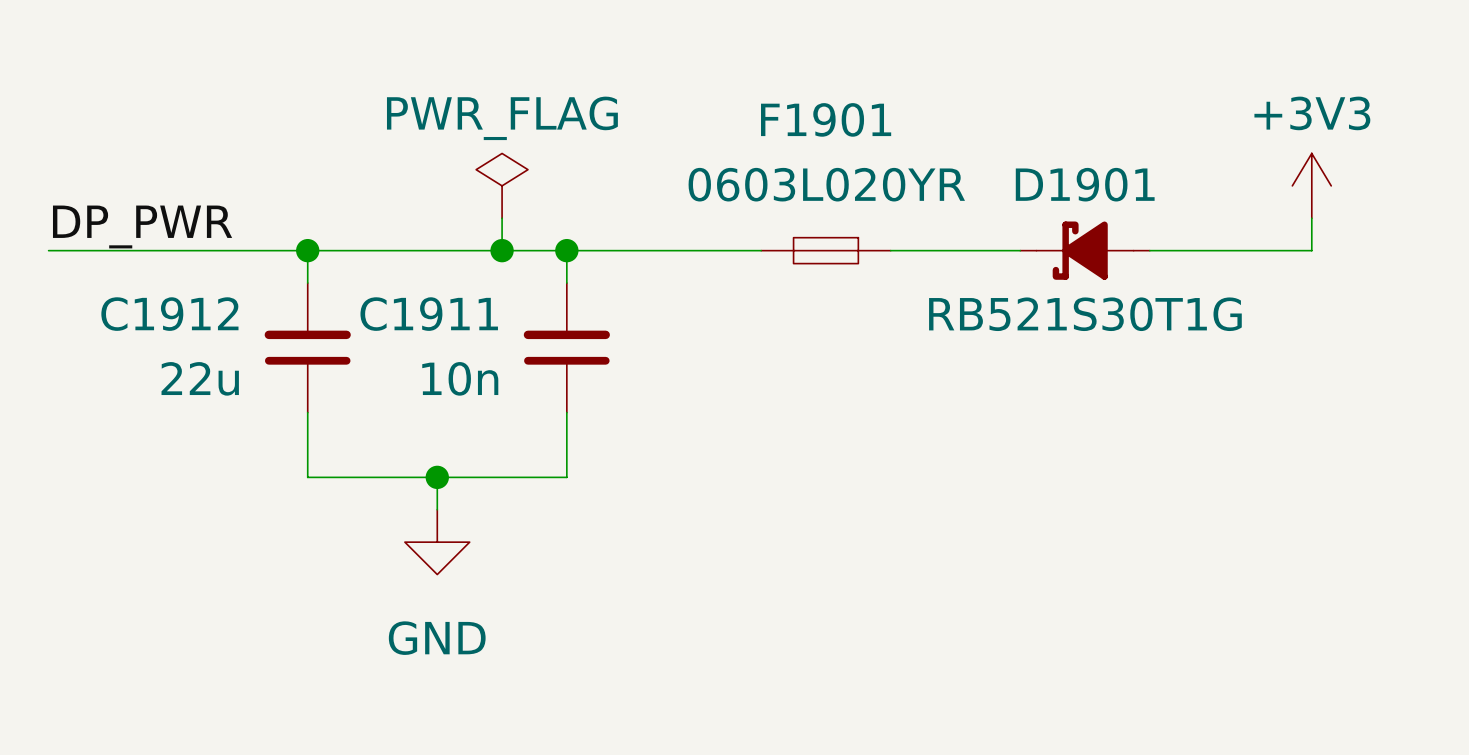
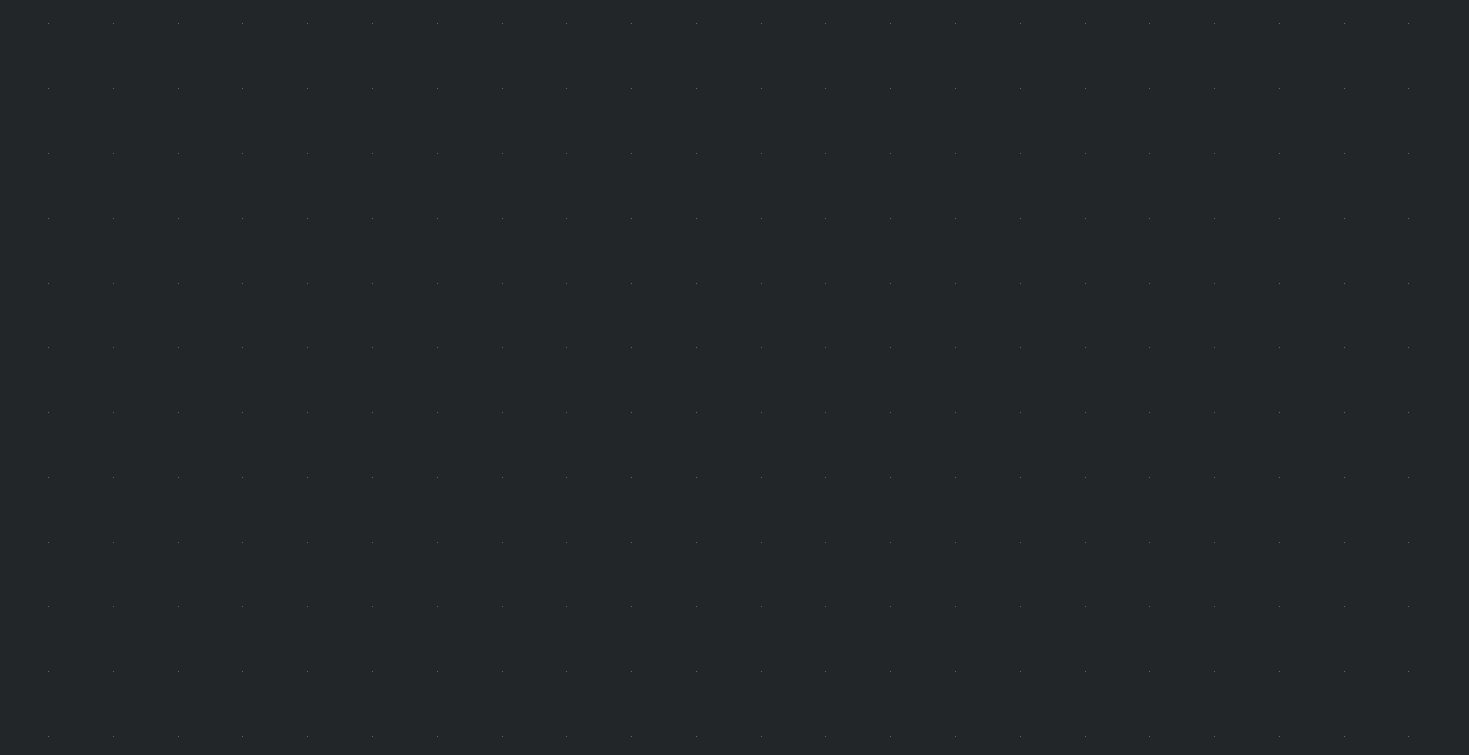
power symbol: PWR_FLAG (502, 185) -> none
power symbol: +3V3 (1311, 185) -> none
wire: (502, 218) (502, 250) -> none
wire: (1311, 218) (1311, 250) (1149, 250) -> none
label: DP_PWR (142, 226) -> none
wire: (48, 250) (761, 250) -> none
wire: (307, 250) (307, 283) -> none
junction: (307, 250) -> none
junction: (502, 250) -> none
wire: (566, 250) (566, 283) -> none
junction: (566, 250) -> none
F1901: (825, 250) -> none
wire: (890, 250) (1020, 250) -> none
D1901: (1085, 250) -> none
C1912: (307, 347) -> none
C1911: (566, 347) -> none
wire: (307, 412) (307, 477) (566, 477) (566, 412) -> none
wire: (437, 477) (437, 509) -> none
junction: (437, 477) -> none
power symbol: GND (437, 542) -> none

